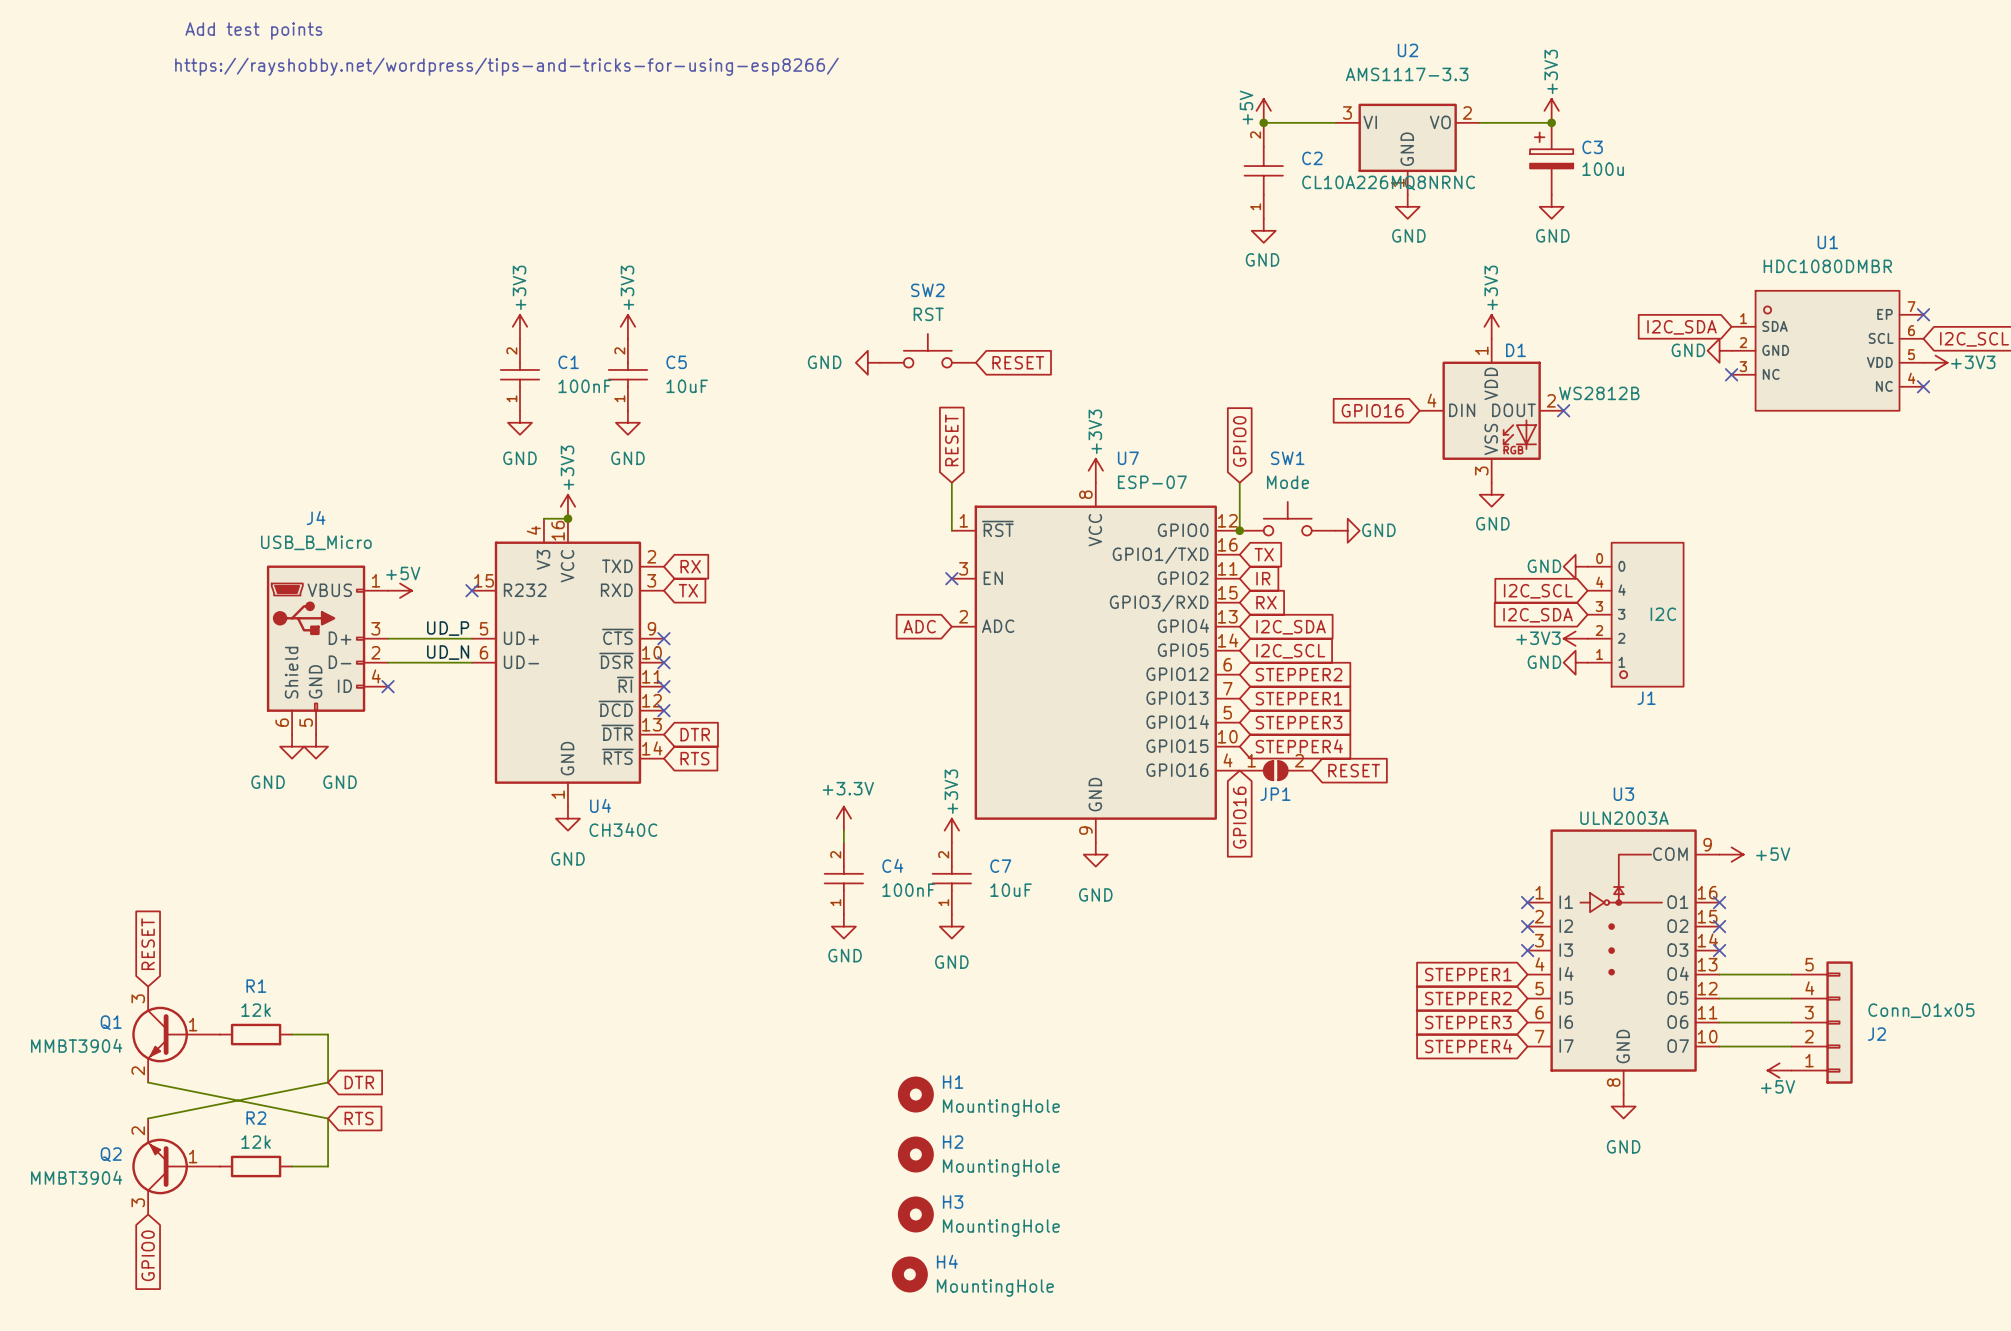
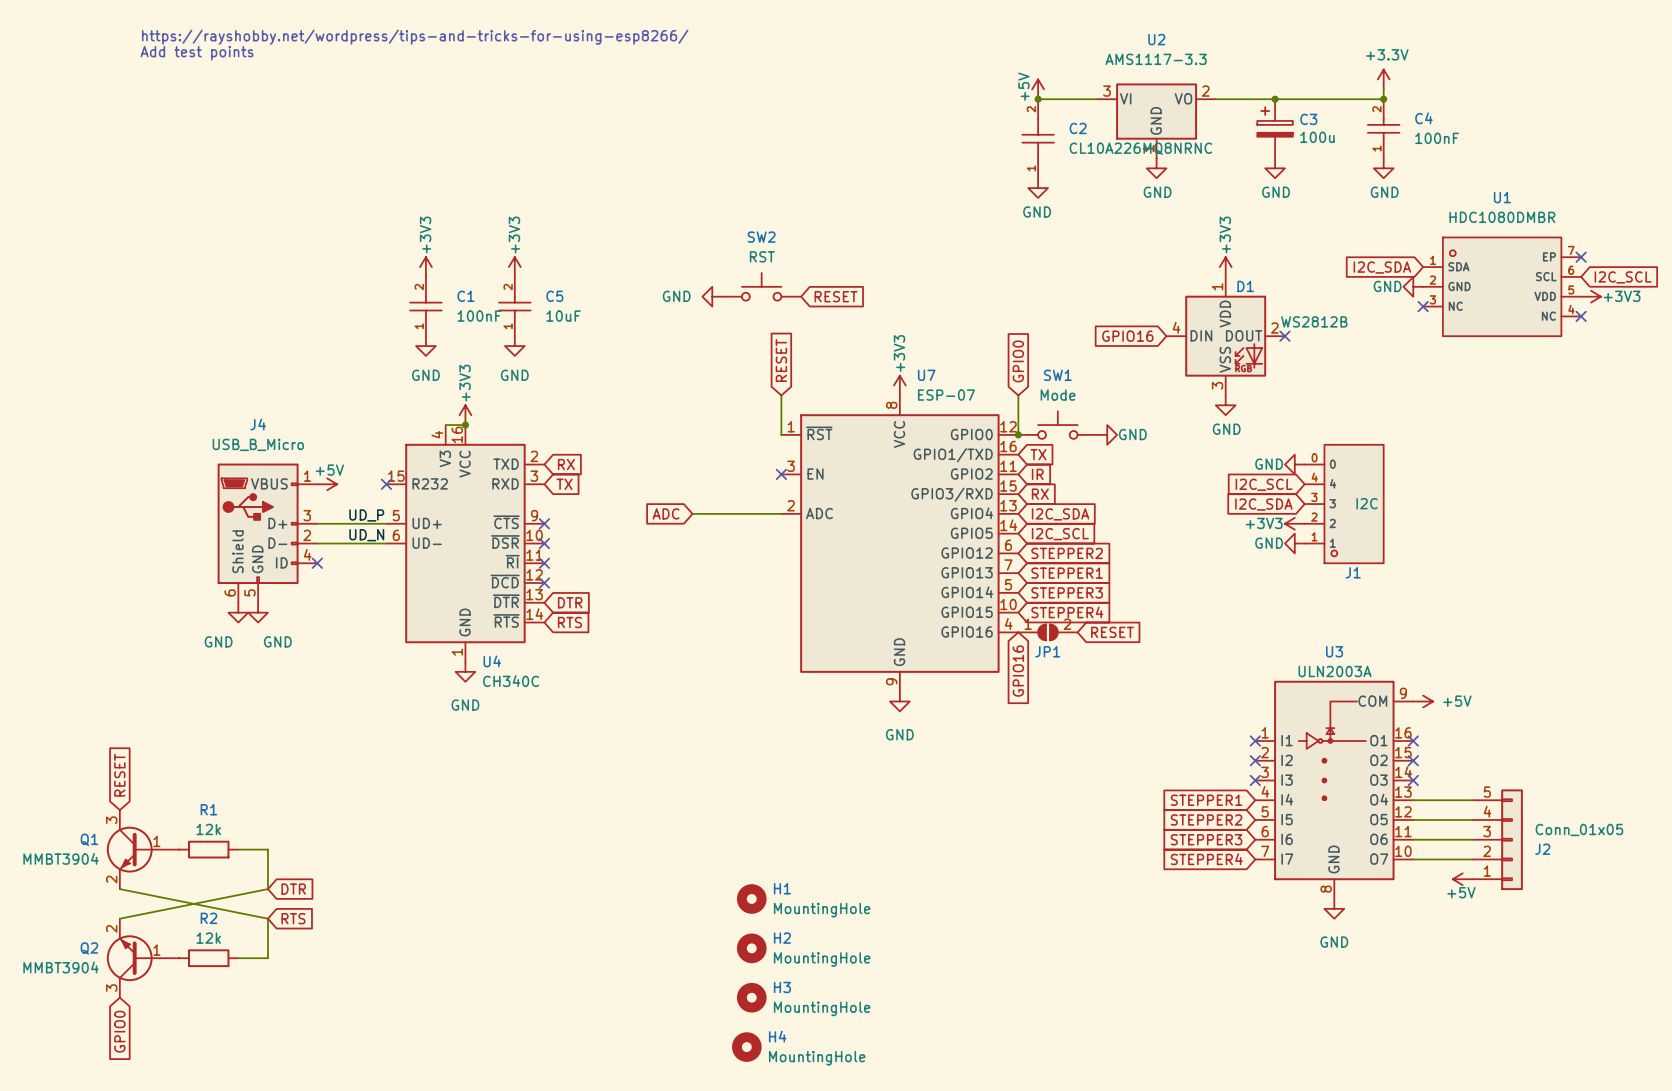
text: Add test points (253, 31) -> none
text: none -> https://rayshobby.net/wordpress/tips-and-tricks-for-using-esp8266/ (415, 37)
text: https://rayshobby.net/wordpress/tips-and-tricks-for-using-esp8266/ (506, 66) -> Add test points (197, 53)
power symbol: none -> +3.3V (1383, 79)
power symbol: +3V3 (1551, 110) -> none
wire: none -> (1383, 89) (1383, 99) (1275, 99)
junction: none -> (1383, 99)
power symbol: none -> GND (1383, 168)
wire: none -> (692, 513) (781, 513)
global label position: ADC (919, 626) -> ADC (666, 513)
power symbol: +3.3V (843, 818) -> none
wire: (843, 830) (843, 842) -> none
power symbol: +3V3 (951, 830) -> none
C4 position: (843, 878) -> (1383, 128)
C7: 10uF (951, 878) -> none
power symbol: GND (843, 926) -> none
power symbol: GND (951, 926) -> none

